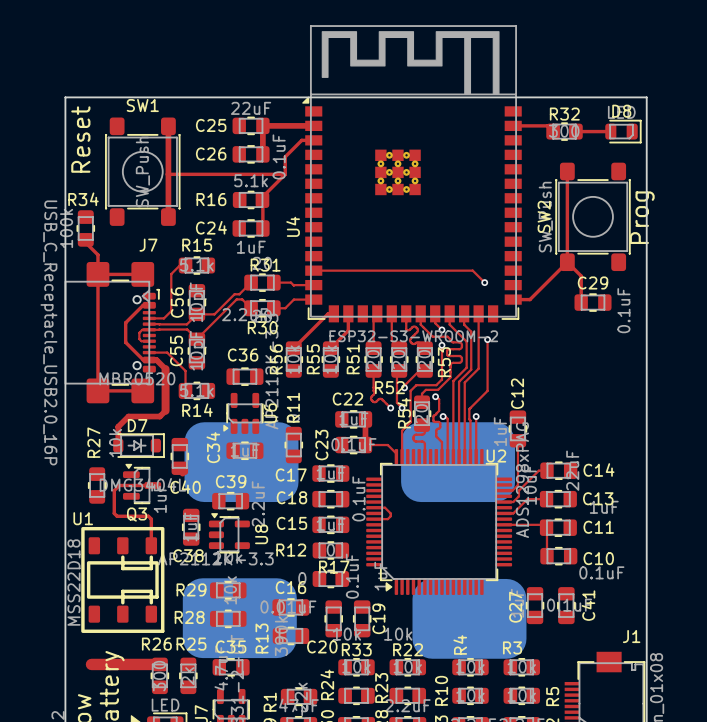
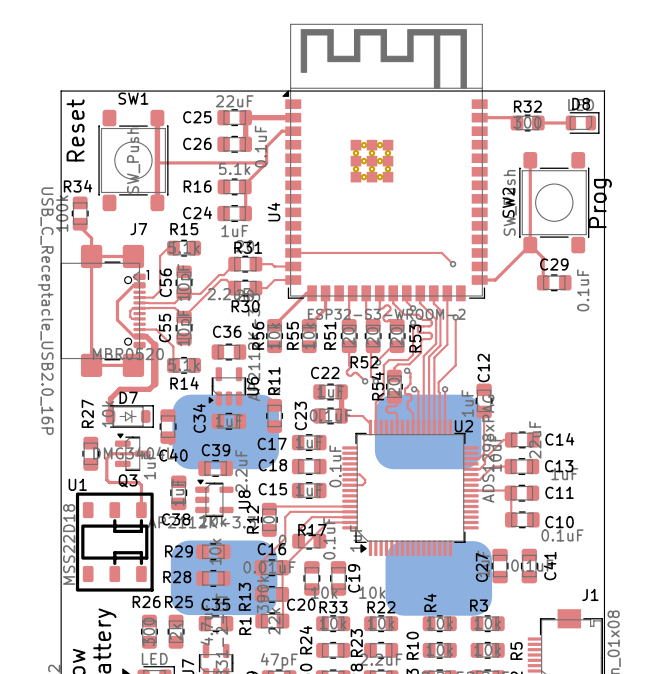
top track: none -> (350, 506) (271, 506) (269, 509)
top track: none -> (350, 511) (290, 511) (285, 517) (285, 538) (260, 562) (261, 594)
R12 name position: R12 (291, 550) -> R12 (252, 519)
R12 rotation: 0° (330, 550) -> 90° clockwise (269, 519)
R12 position: (330, 550) -> (269, 519)
top track: none -> (350, 517) (311, 517) (298, 530)
top track: none -> (350, 522) (327, 522) (283, 567) (283, 621)
top track: (91, 664) (159, 664) -> none
R1 position: (299, 696) -> (272, 621)

